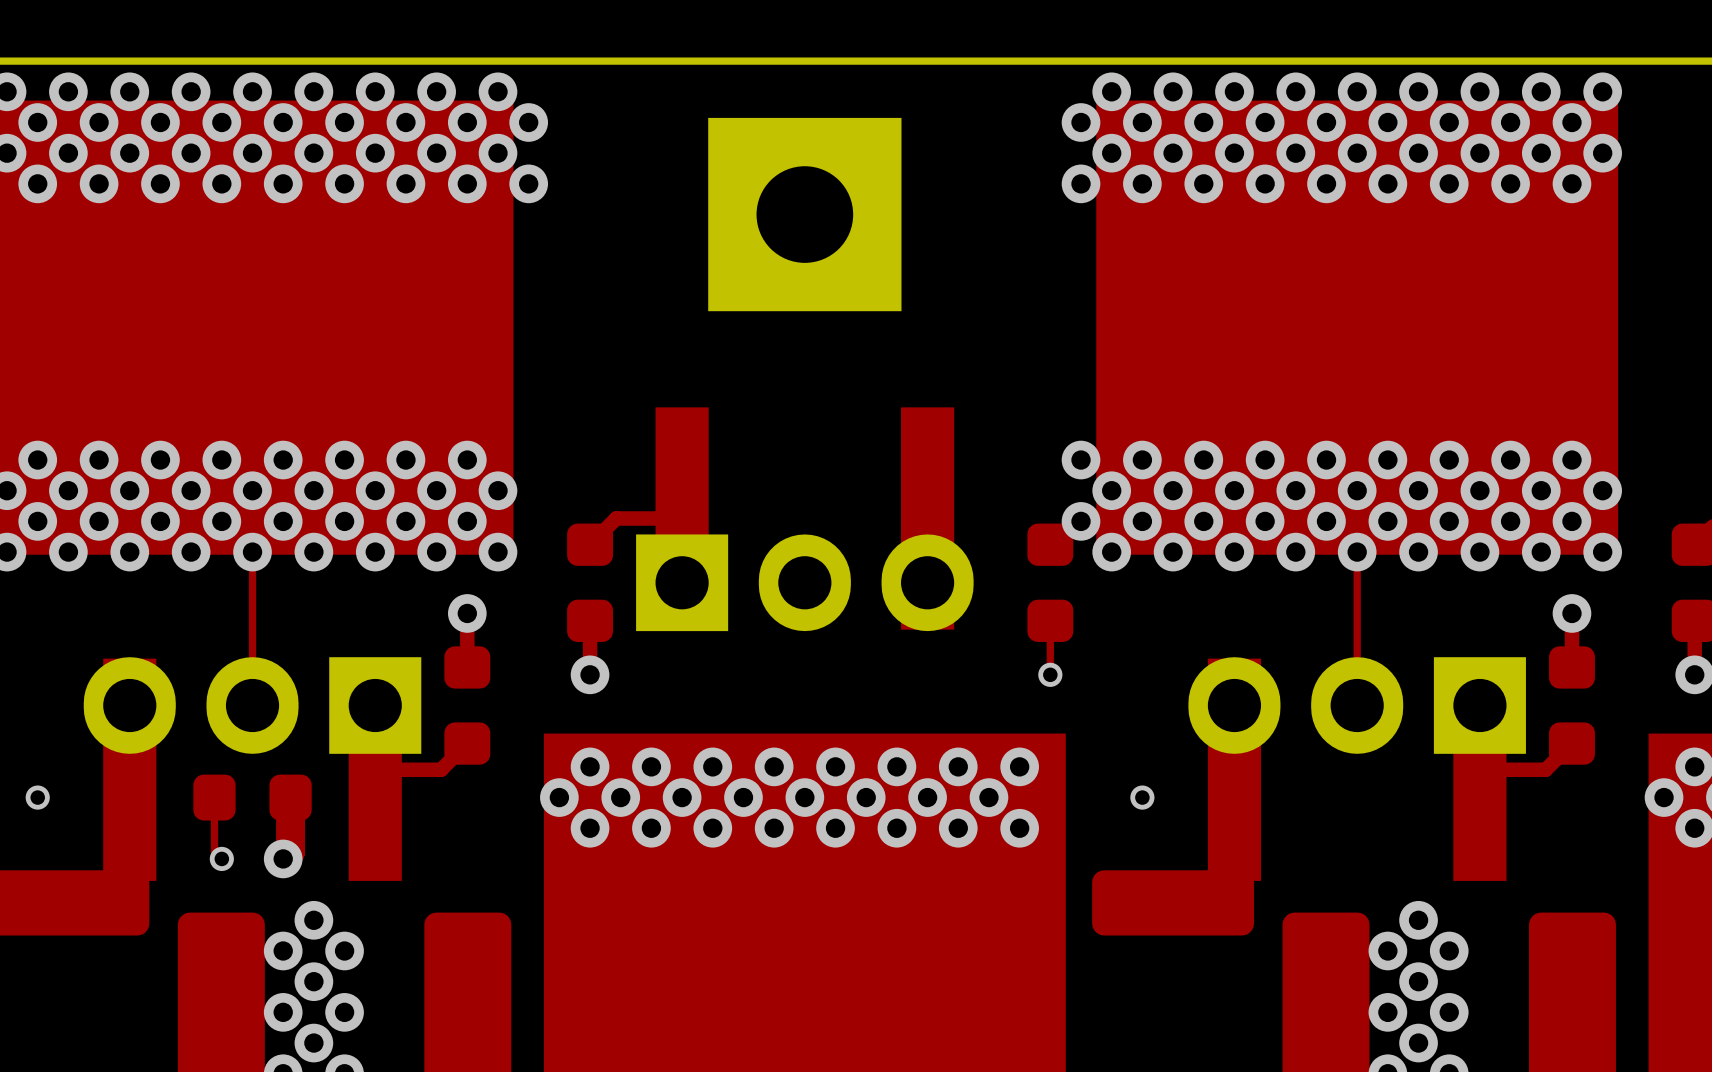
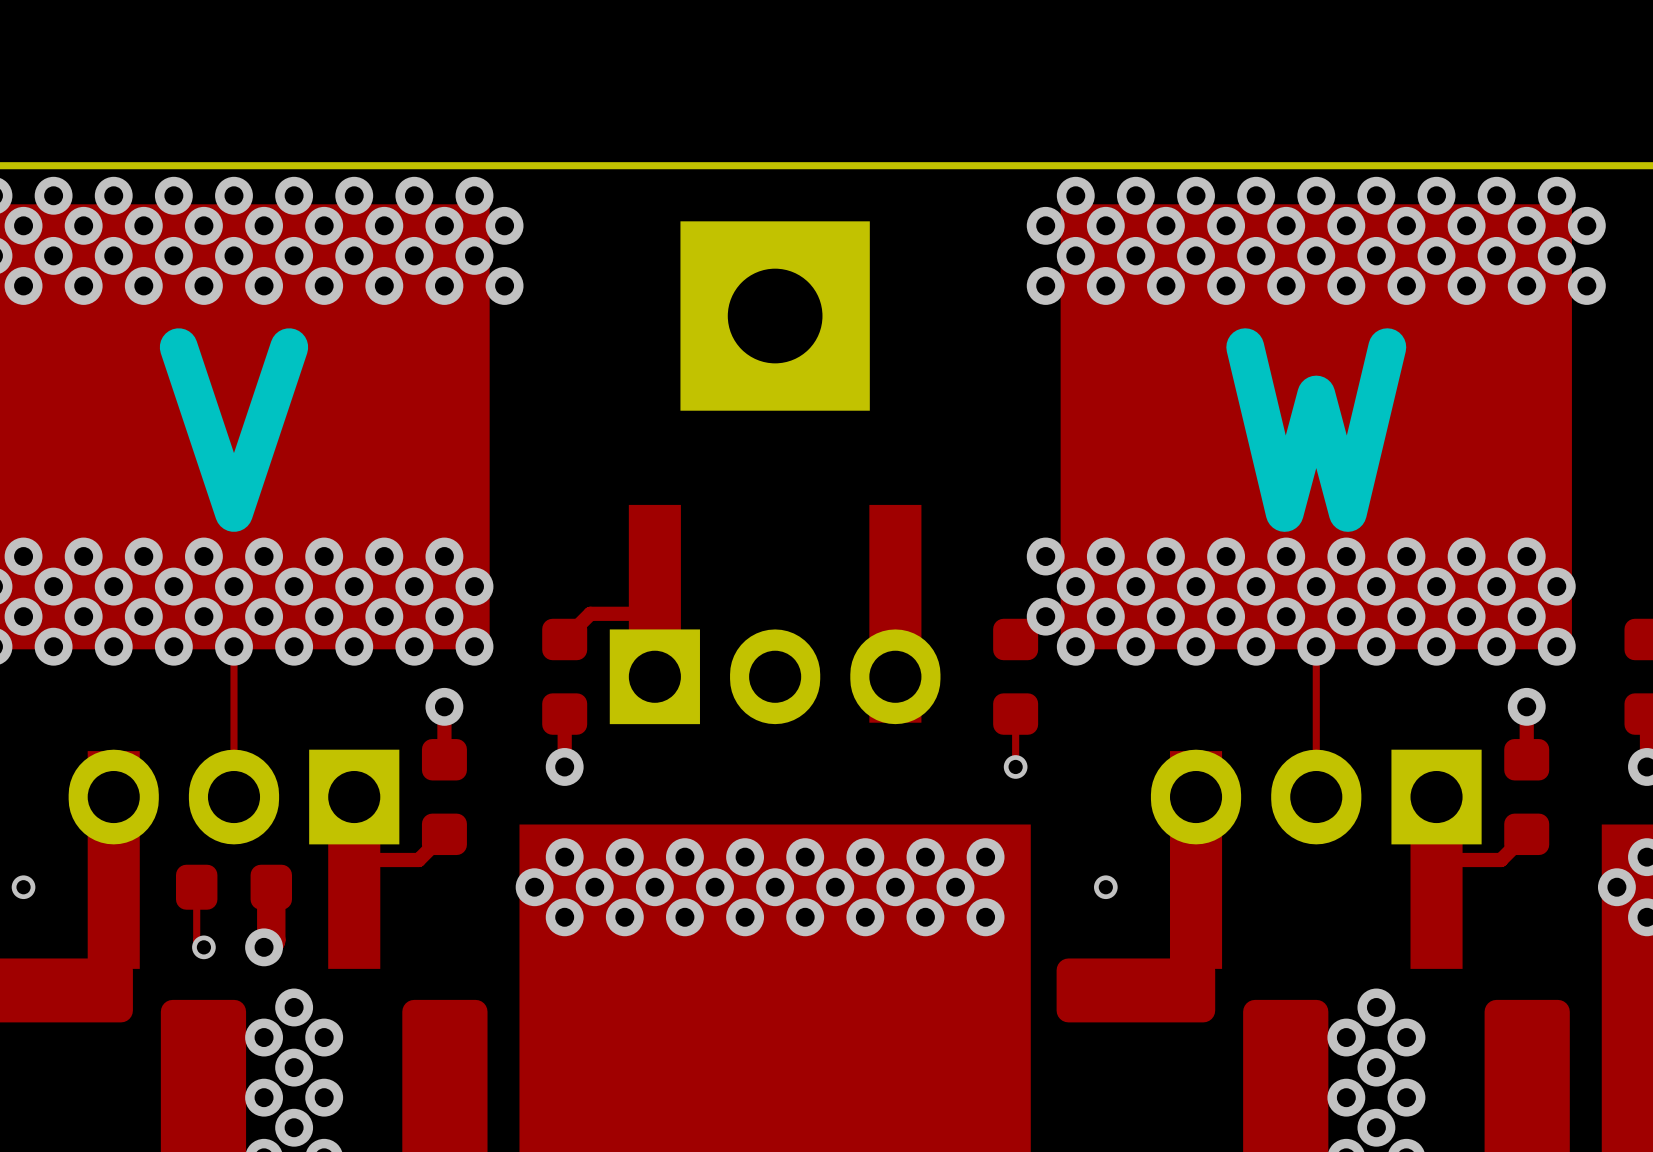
via: none -> (1586, 225)
via: none -> (1586, 285)
text: none -> V (233, 430)
text: none -> W (1316, 430)

